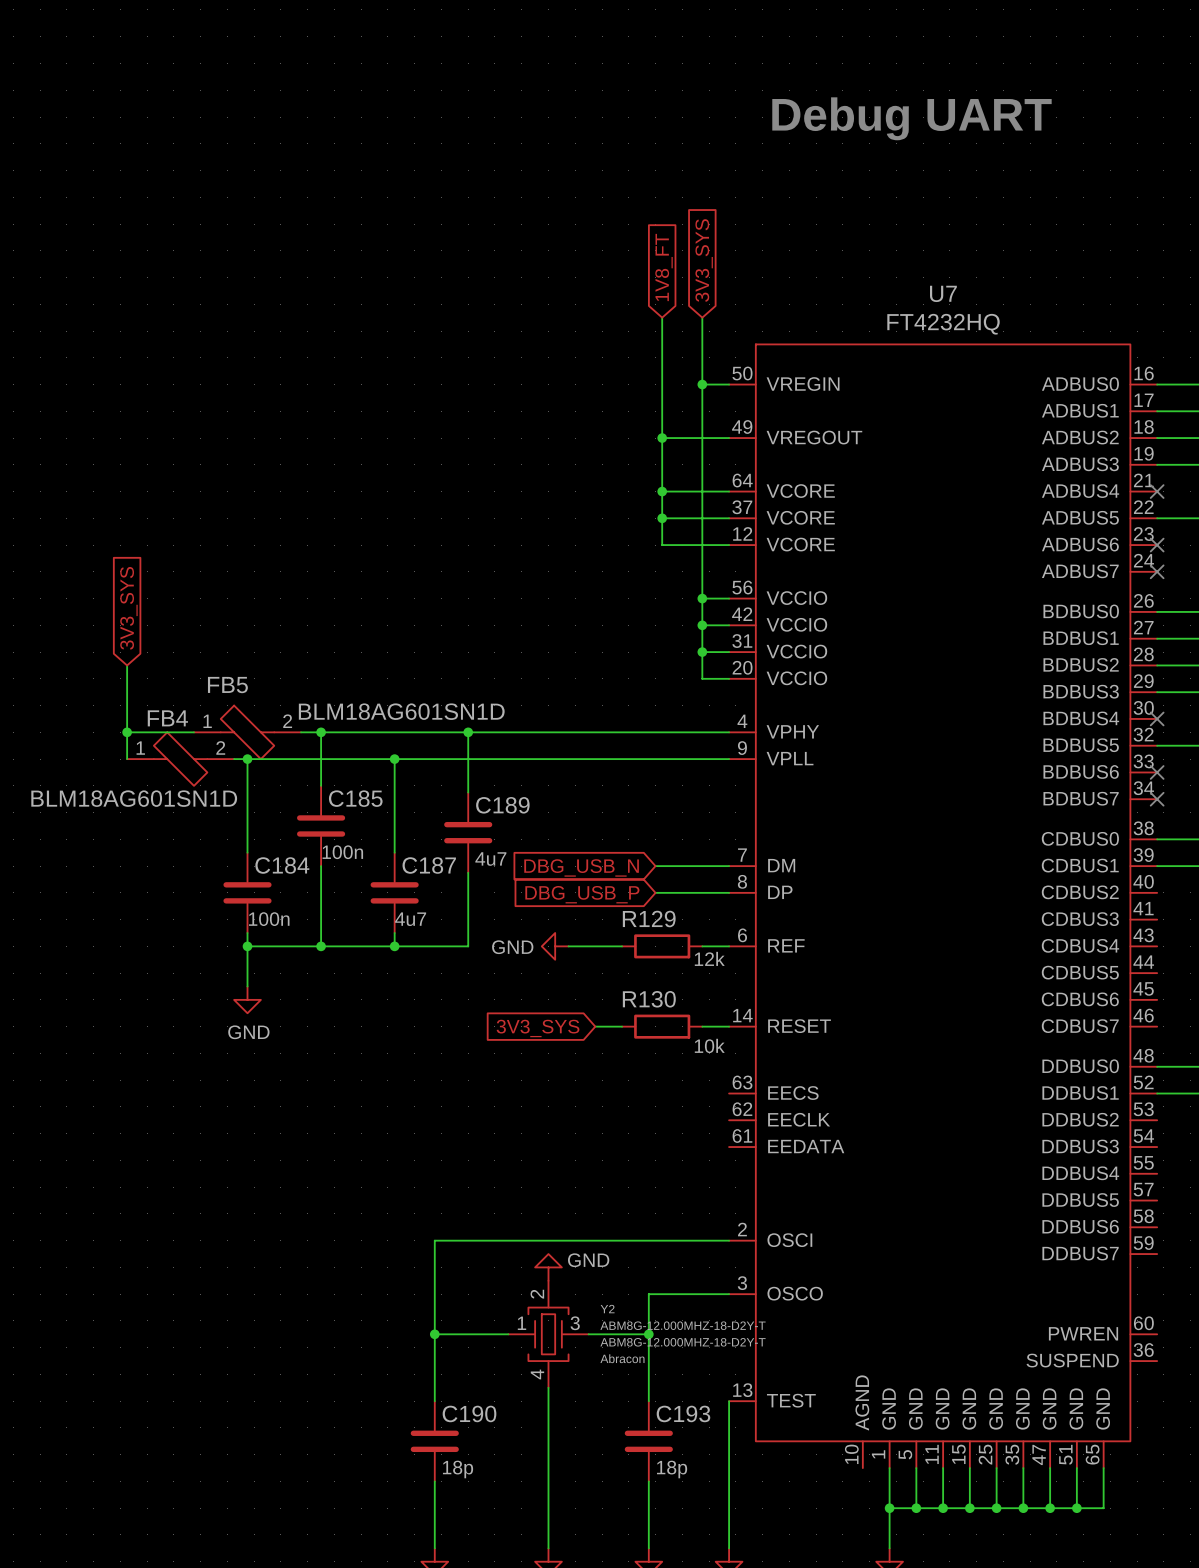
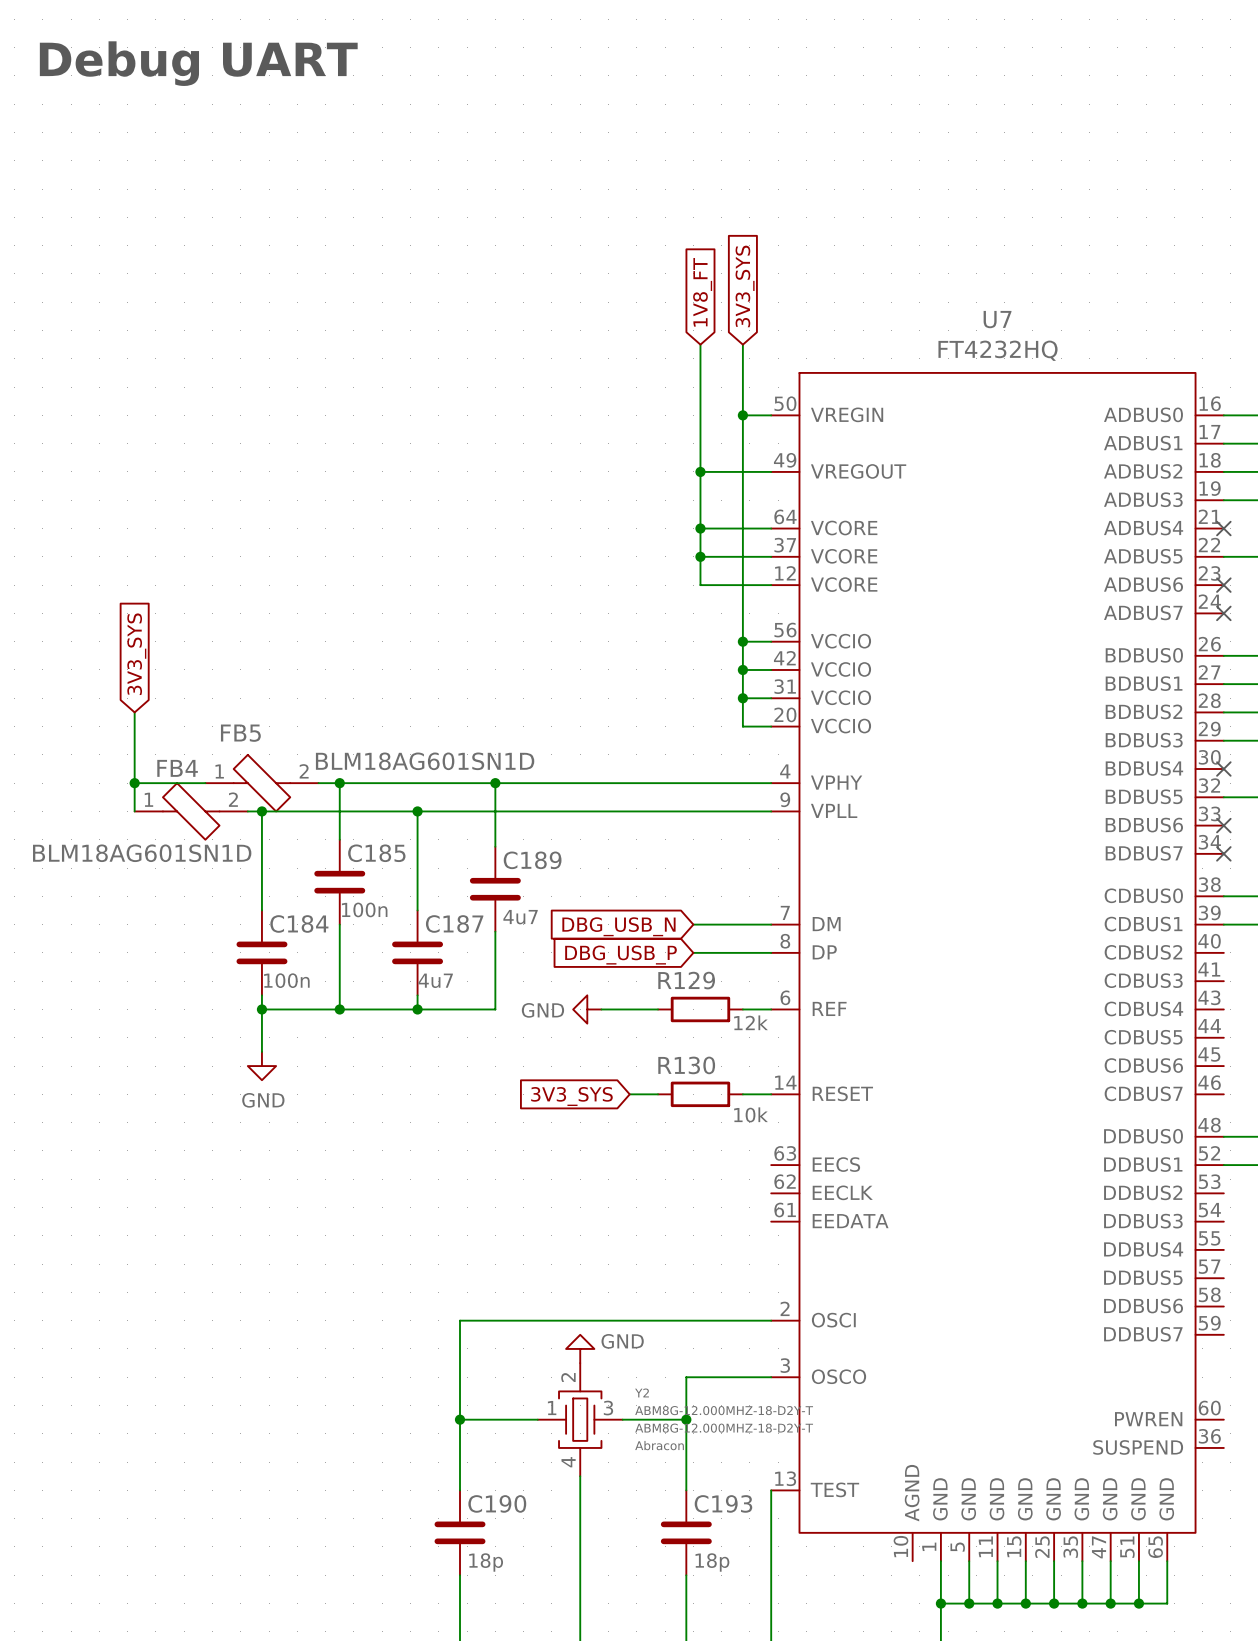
text: none -> Debug UART (198, 63)
text: Debug UART (911, 118) -> none

